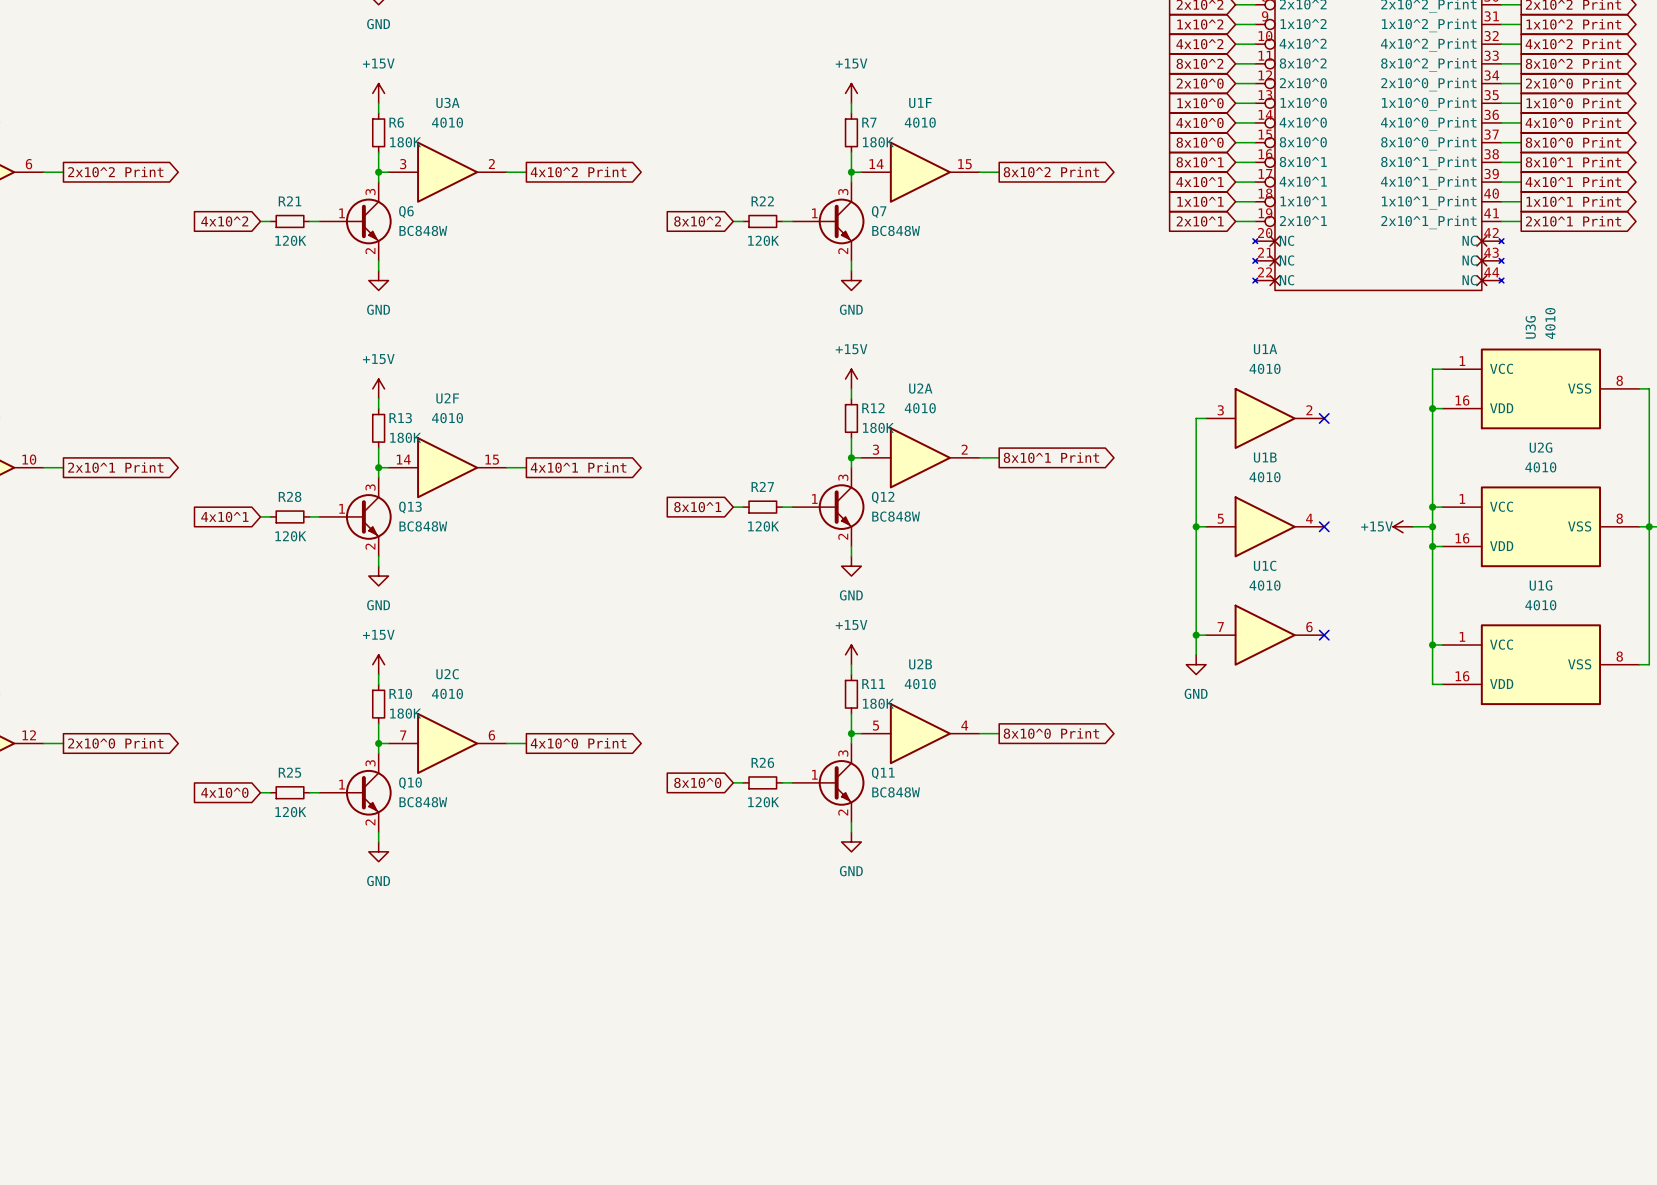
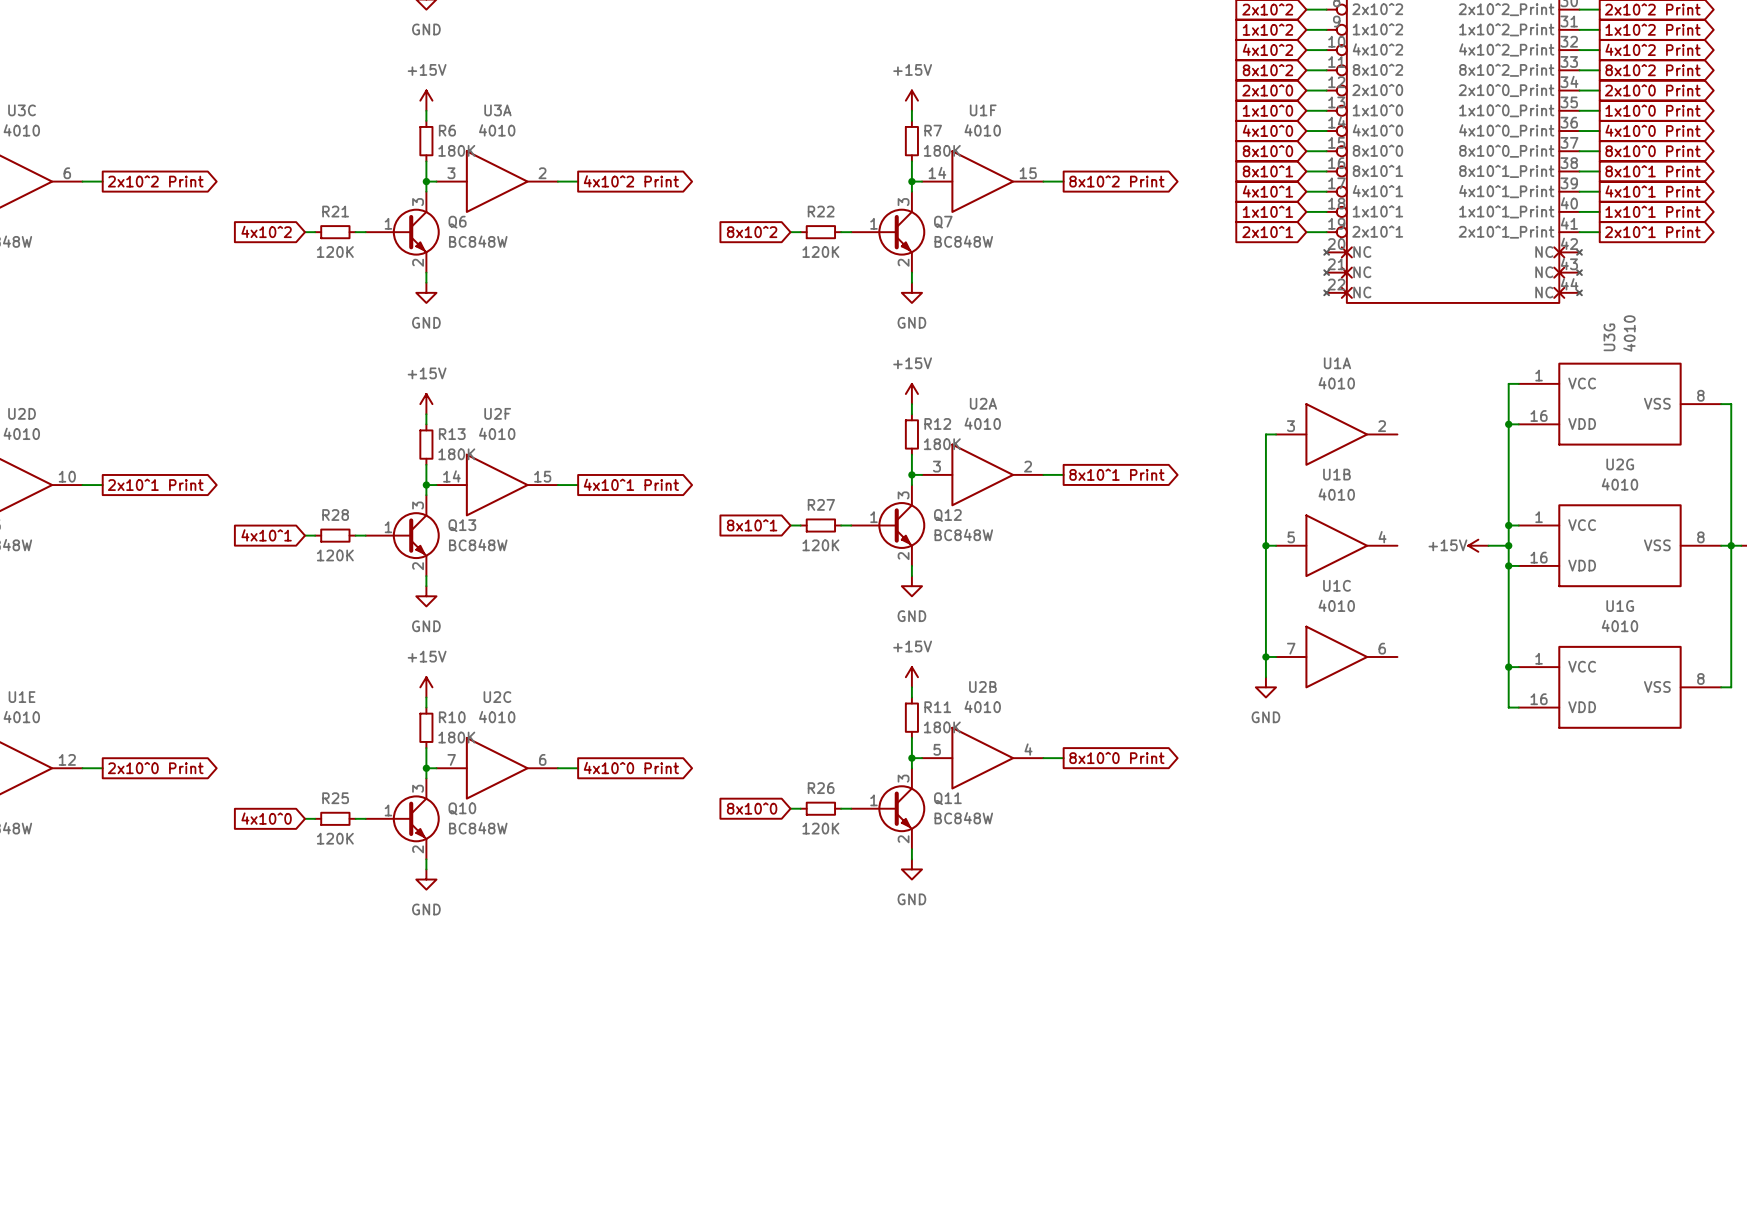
no-connect mark: (1324, 418) -> none
no-connect mark: (1324, 526) -> none
no-connect mark: (1324, 635) -> none

